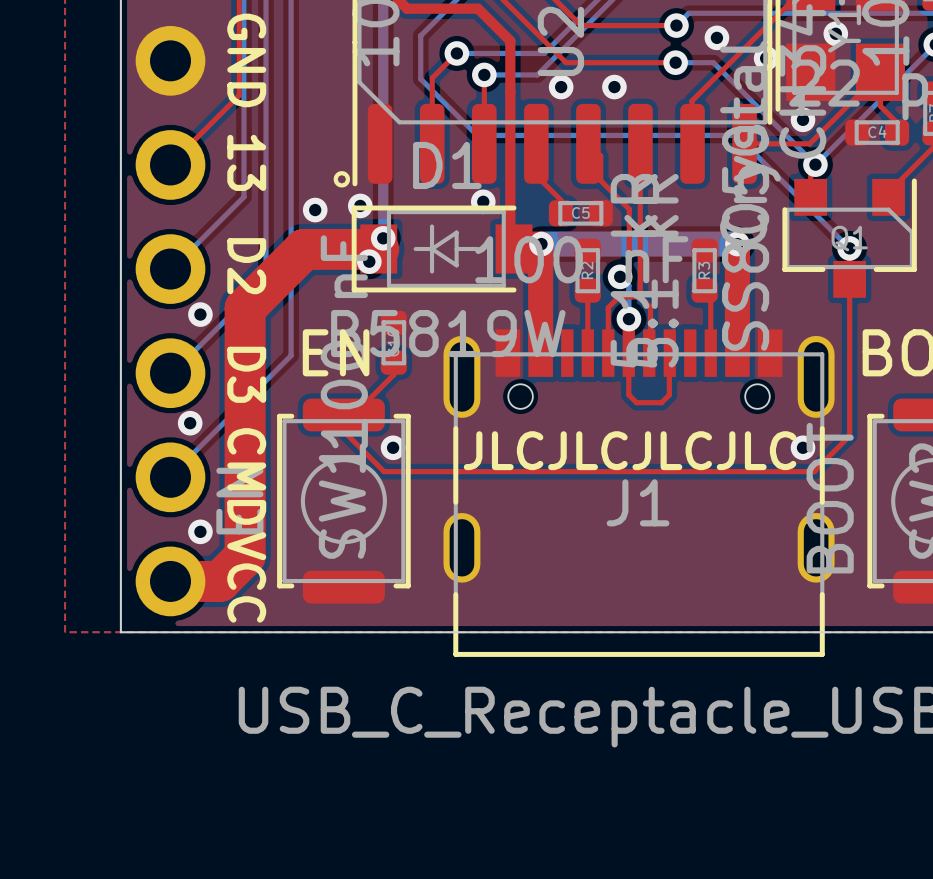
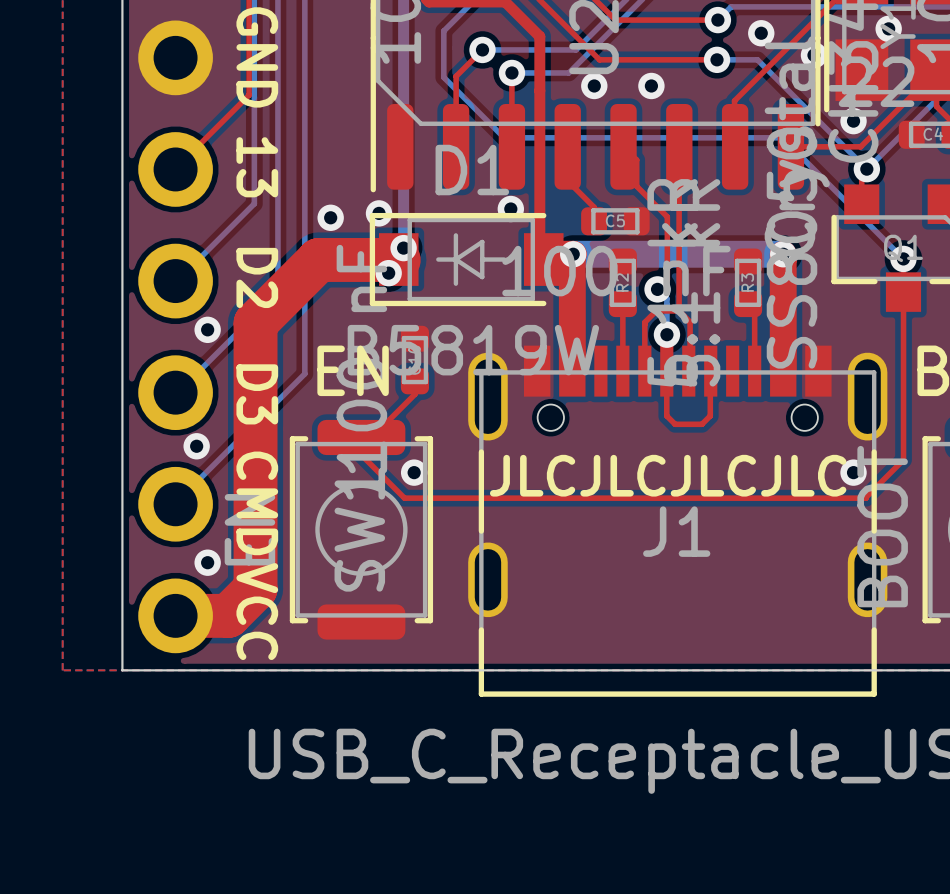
drawing: [333, 171, 351, 188] -> none

